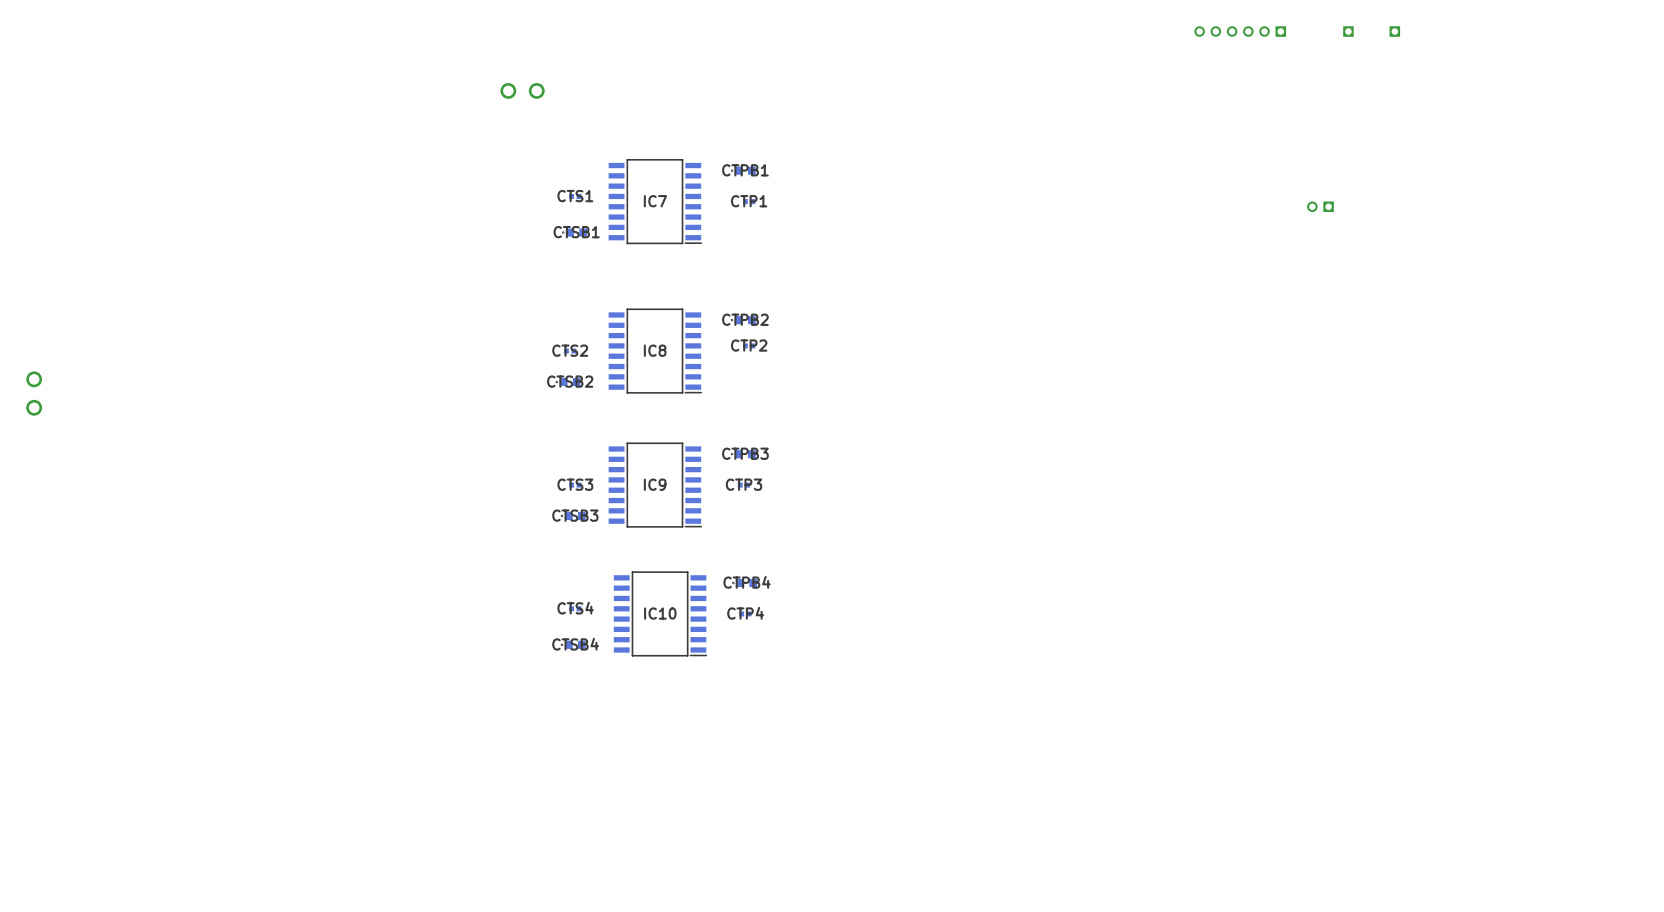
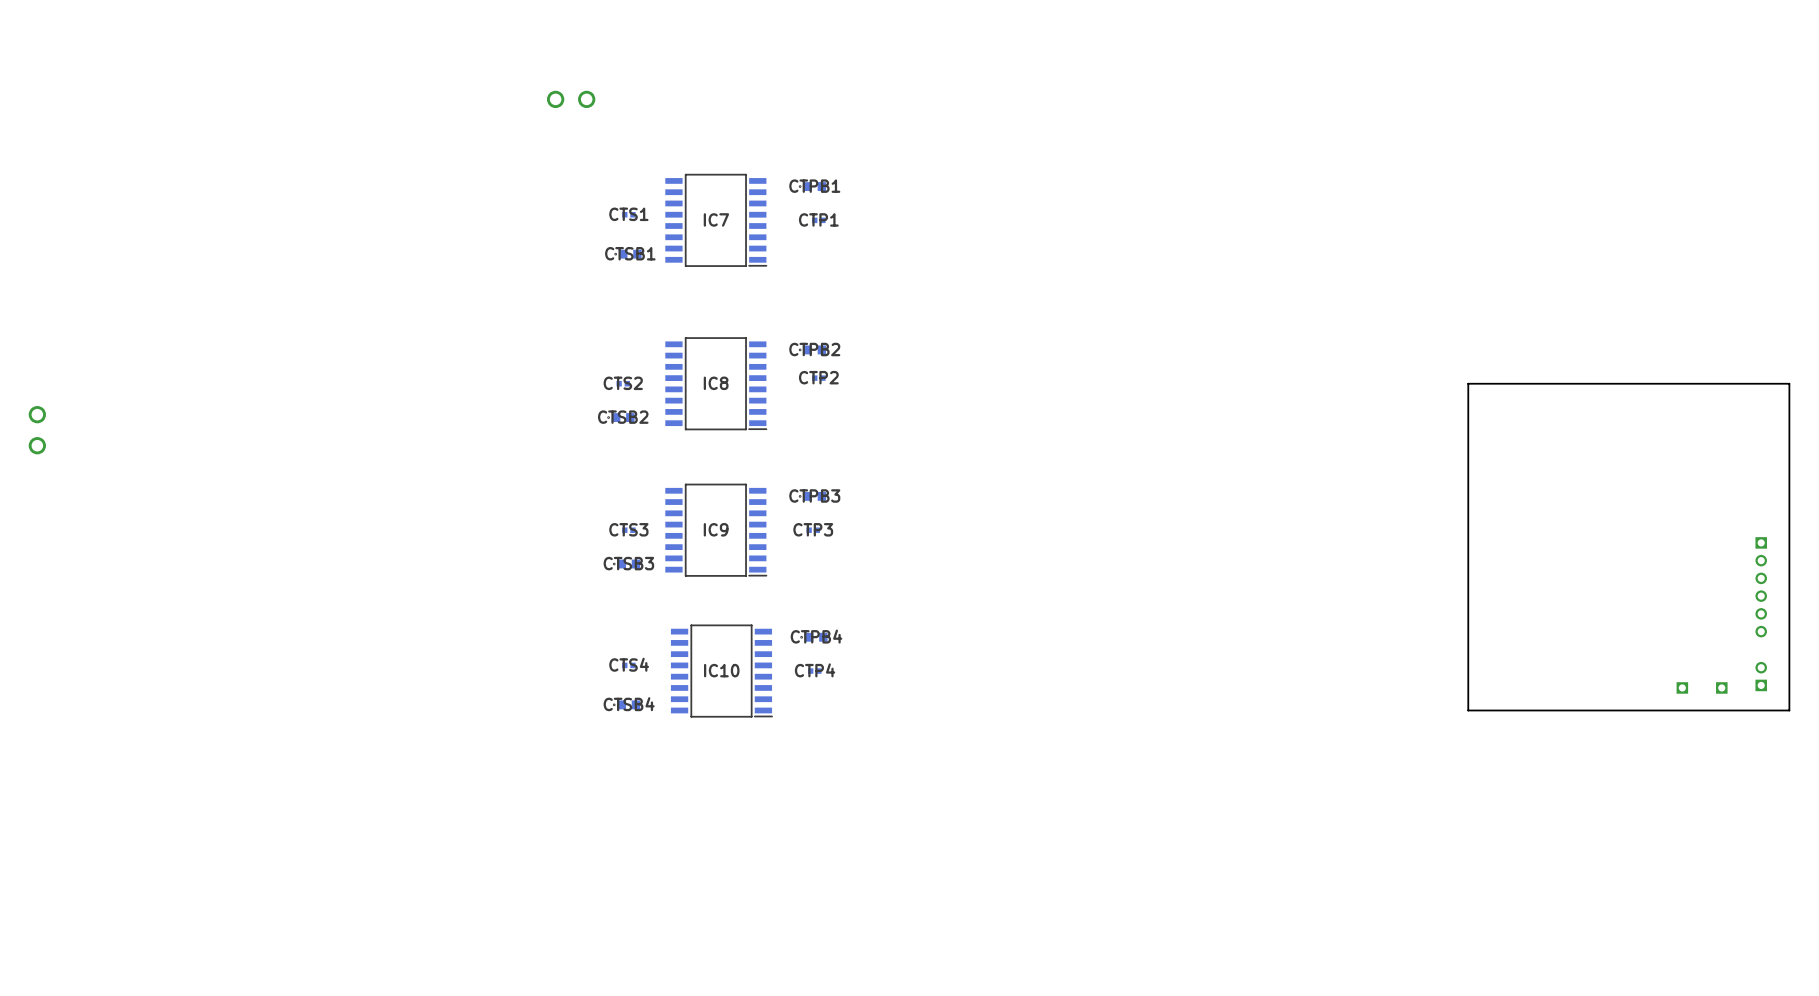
part: (1240, 31) -> none
part: (1348, 31) -> none
part: (1394, 31) -> none
part: (1320, 206) -> none
board edge: none -> (1789, 383) (1468, 383) (1468, 710) (1789, 710) (1789, 383)
part: none -> (1761, 587)
part: none -> (1761, 676)
part: none -> (1682, 687)
part: none -> (1721, 687)

